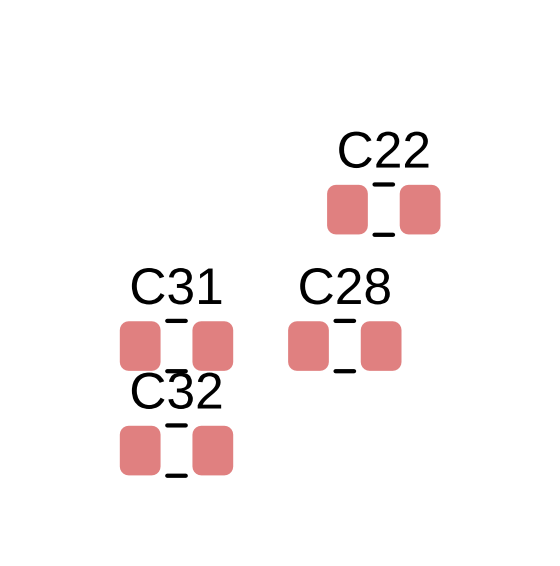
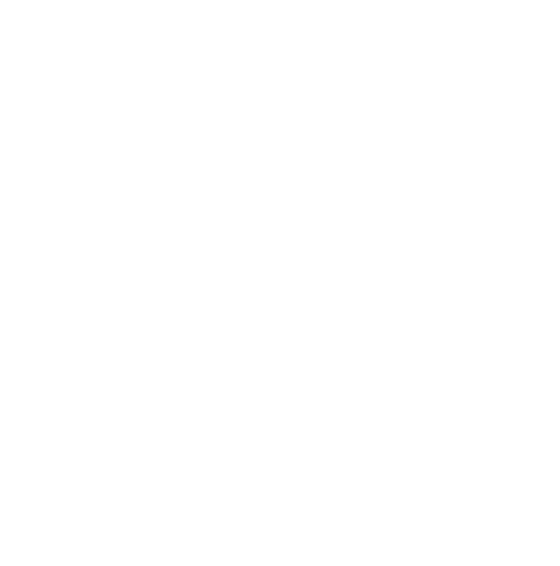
C22: (383, 209) -> none
C31: (176, 346) -> none
C28: (344, 346) -> none
C32: (176, 450) -> none

